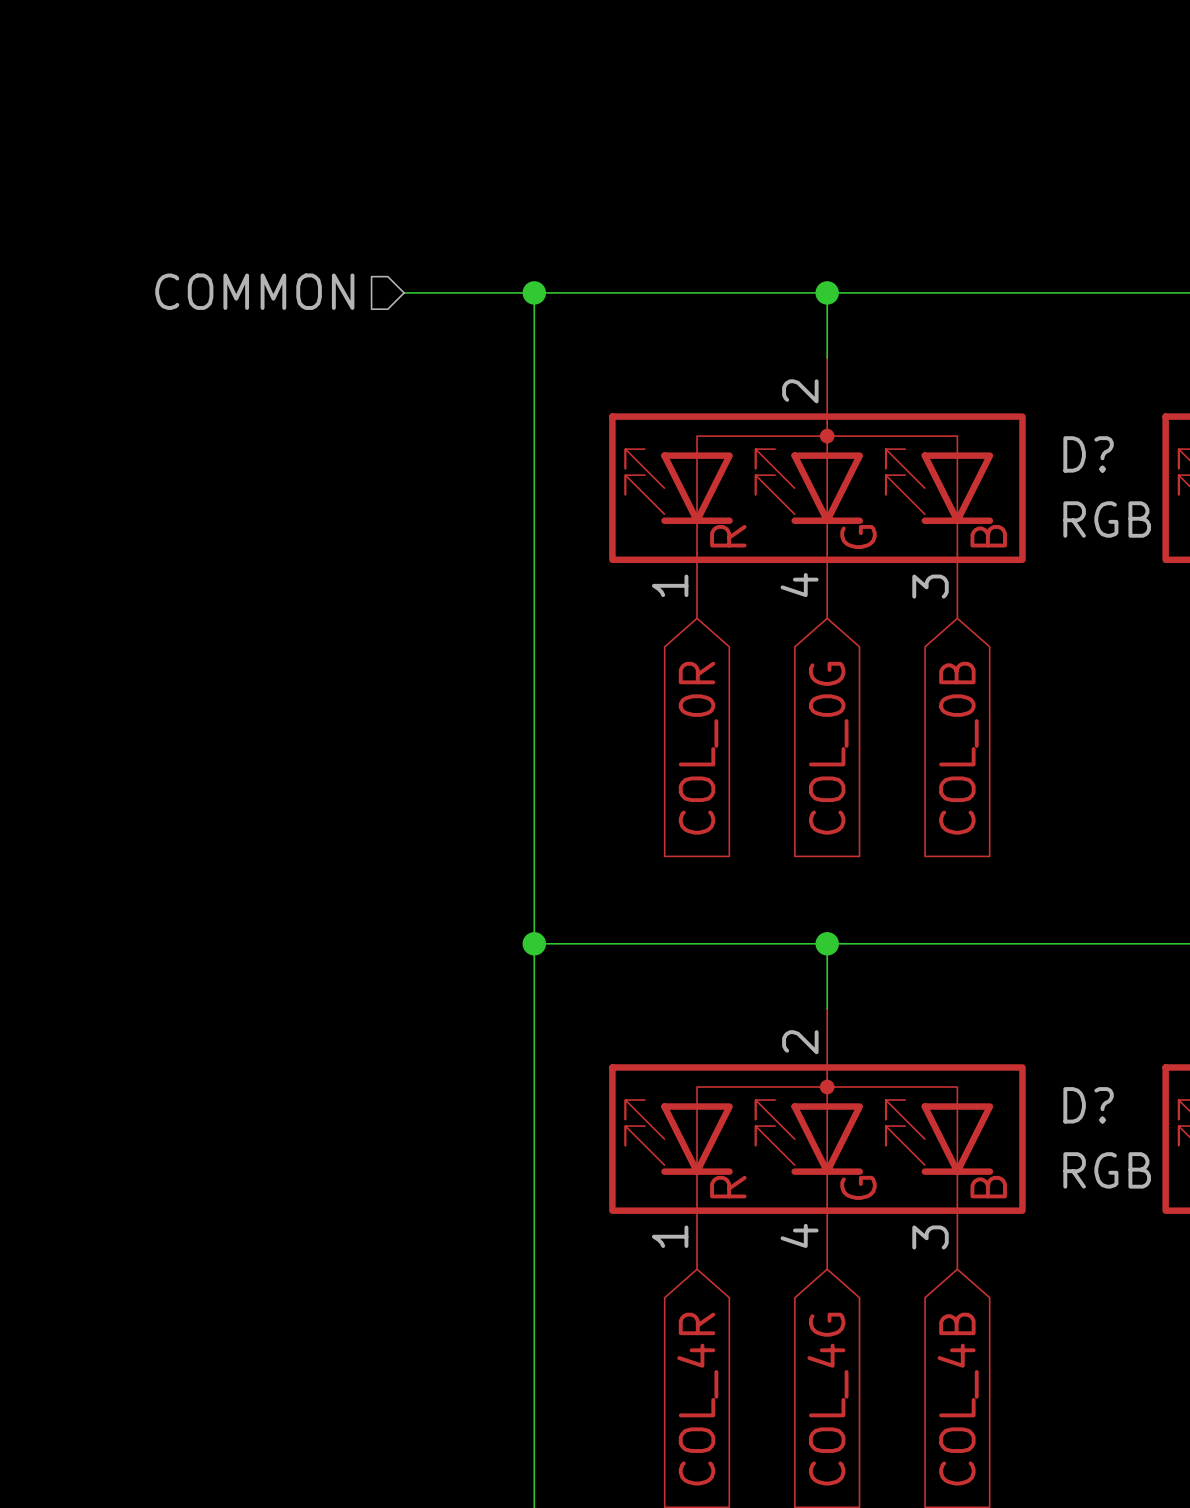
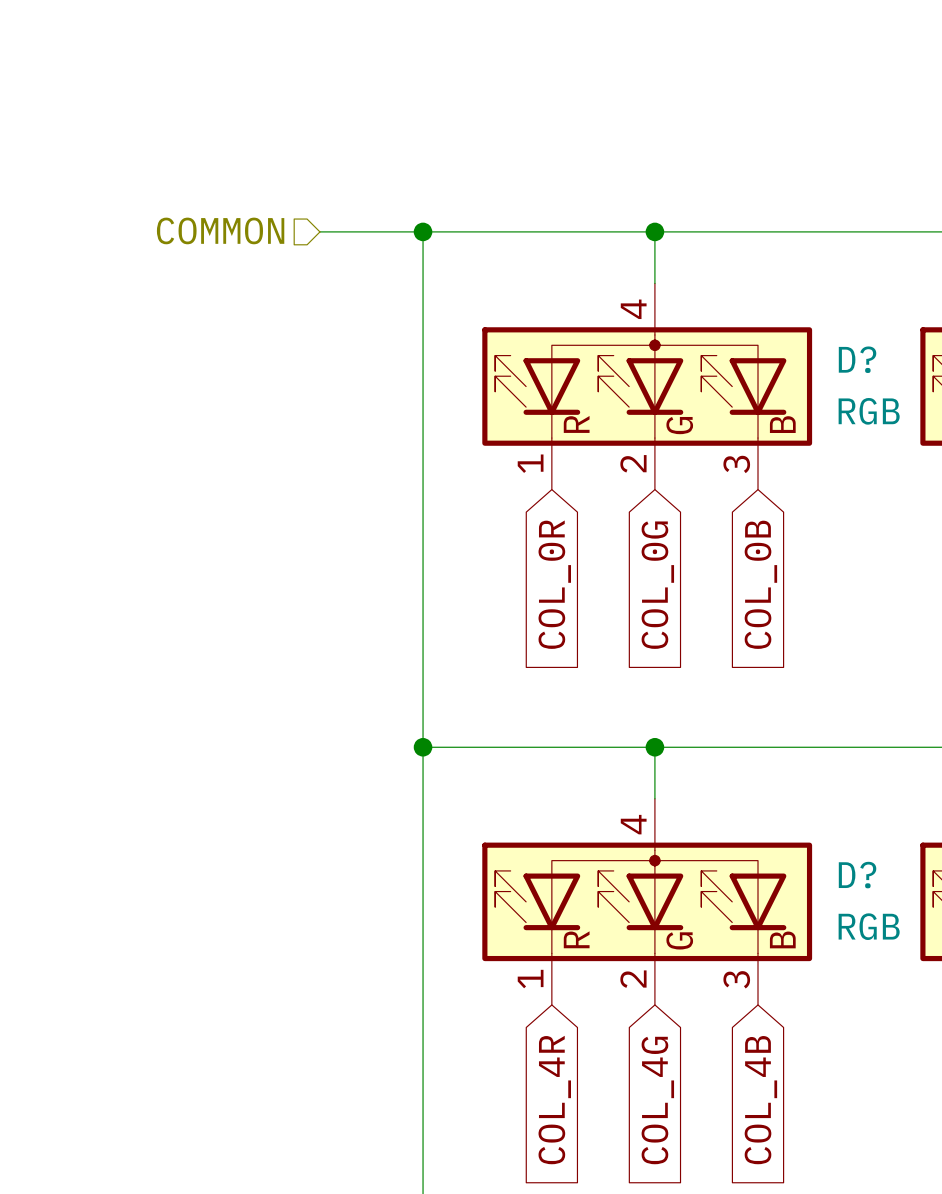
D? pin number: 2 (800, 391) -> 4 (633, 309)
D? pin number: 4 (799, 585) -> 2 (633, 463)
D? pin number: 2 (800, 1042) -> 4 (633, 824)
D? pin number: 4 (799, 1235) -> 2 (633, 979)

